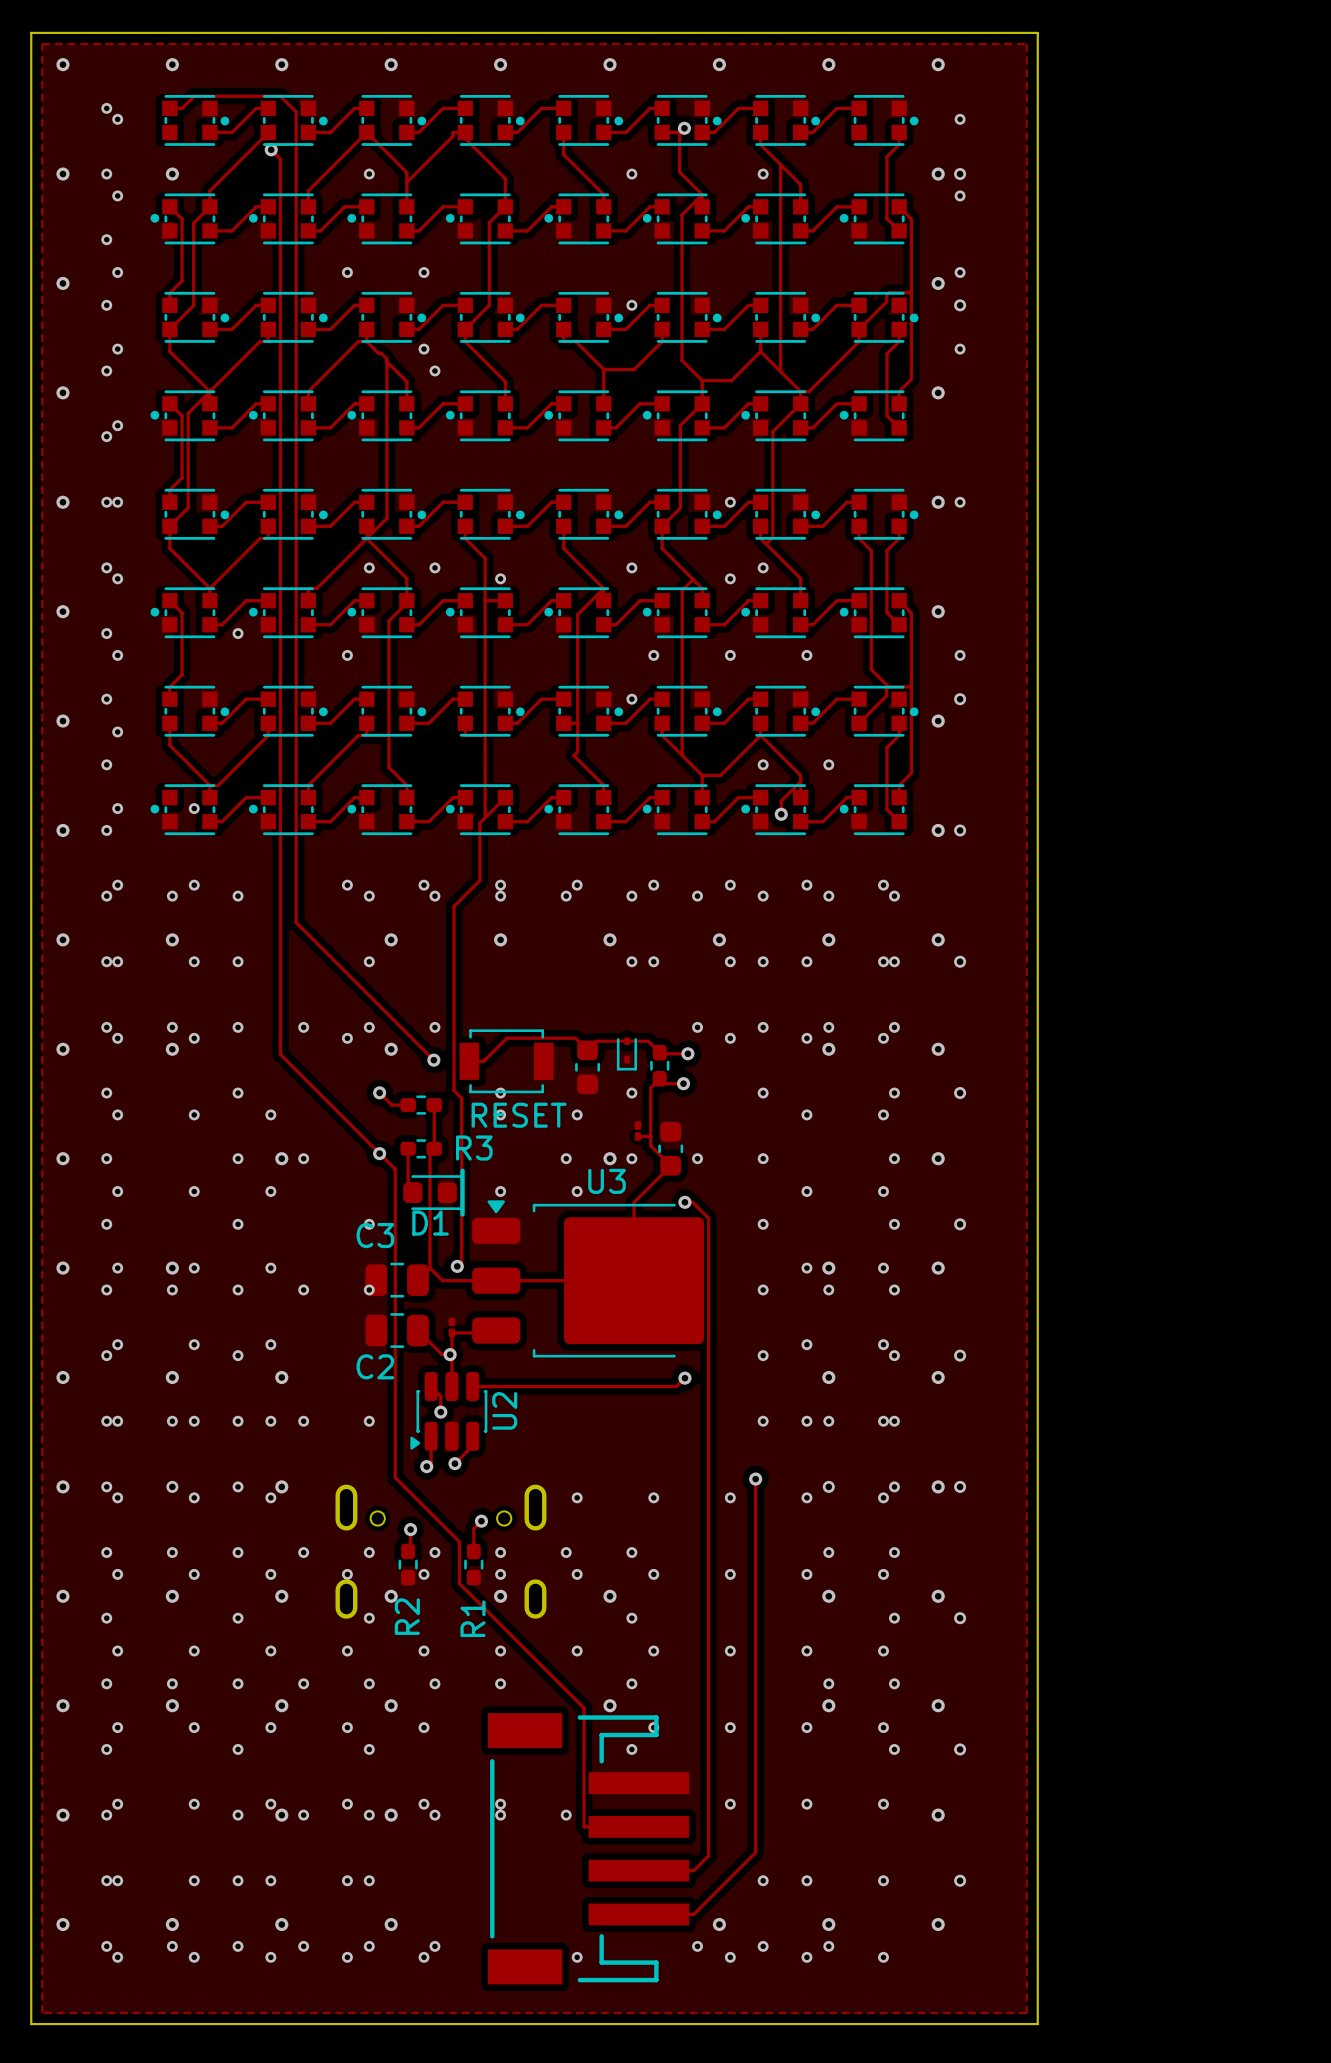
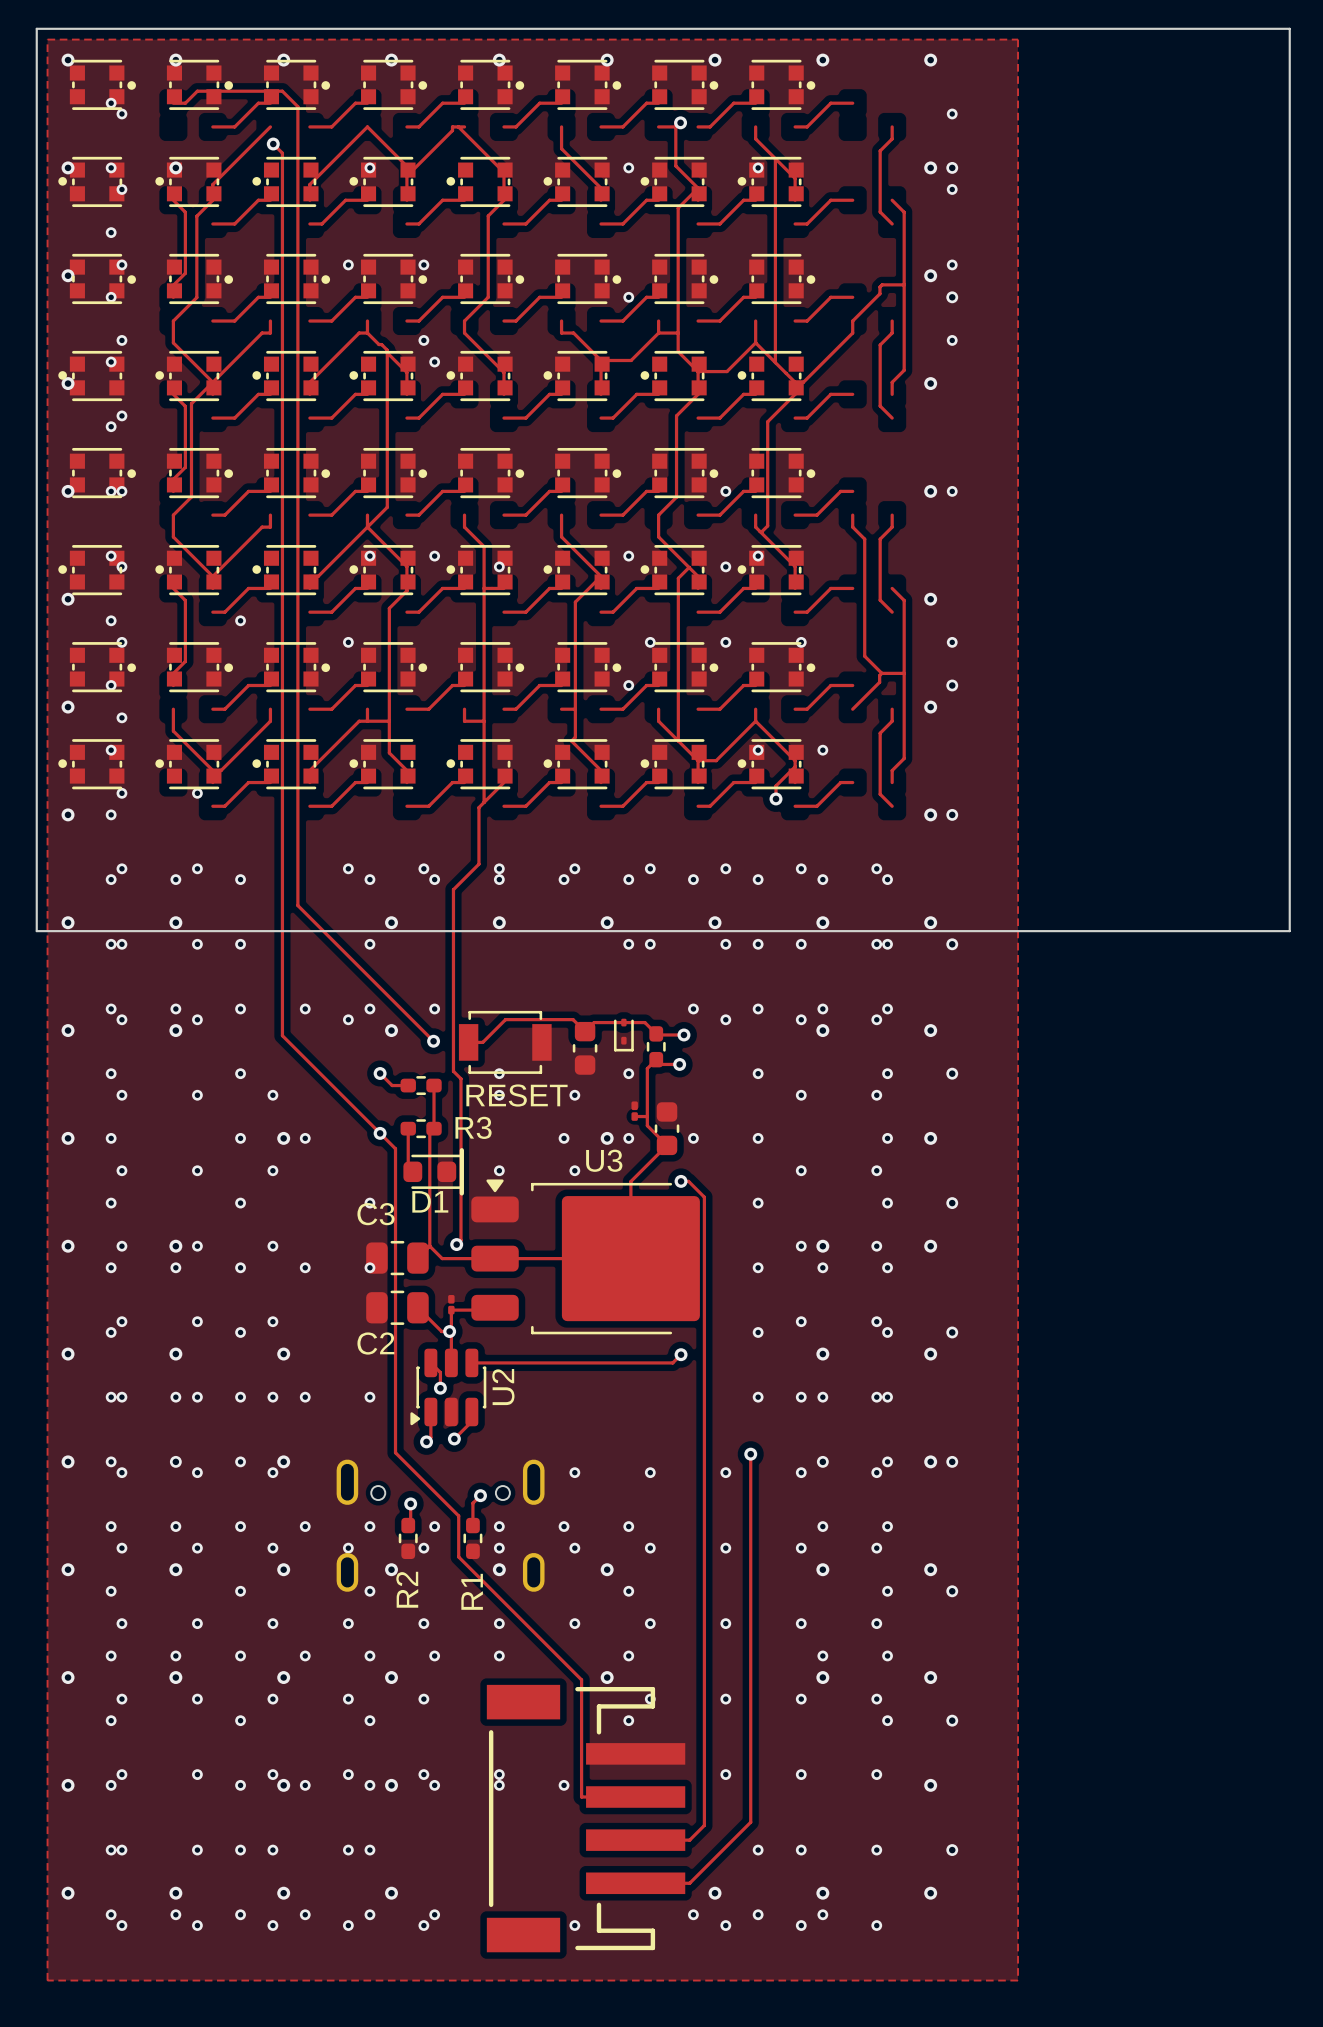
board edge: (1037, 32) (1037, 2024) (31, 2024) (31, 948) -> (1028, 28) (1289, 28) (1289, 931) (36, 931)
part: none -> (102, 84)
part position: (195, 120) -> (199, 84)
part position: (294, 120) -> (297, 84)
part position: (392, 120) -> (394, 84)
part position: (491, 120) -> (491, 84)
part position: (589, 120) -> (588, 84)
part position: (688, 120) -> (685, 84)
part position: (786, 120) -> (782, 84)
part: (884, 120) -> none
part: none -> (91, 181)
part position: (184, 218) -> (188, 181)
part position: (282, 218) -> (285, 181)
part position: (380, 218) -> (382, 181)
part position: (479, 218) -> (479, 181)
part position: (577, 218) -> (576, 181)
part position: (676, 218) -> (673, 181)
part position: (774, 218) -> (770, 181)
part: (873, 218) -> none
part: none -> (102, 278)
part position: (195, 317) -> (199, 278)
part position: (294, 317) -> (297, 278)
part position: (392, 317) -> (394, 278)
part position: (491, 317) -> (491, 278)
part position: (589, 317) -> (588, 278)
part position: (688, 317) -> (685, 278)
part position: (786, 317) -> (782, 278)
part: (884, 317) -> none
part: none -> (91, 376)
part position: (184, 415) -> (188, 376)
part position: (282, 415) -> (285, 376)
part position: (380, 415) -> (382, 376)
part position: (479, 415) -> (479, 376)
part position: (577, 415) -> (576, 376)
part position: (676, 415) -> (673, 376)
part position: (774, 415) -> (770, 376)
part: (873, 415) -> none
part: none -> (102, 473)
part position: (195, 514) -> (199, 473)
part position: (294, 514) -> (297, 473)
part position: (392, 514) -> (394, 473)
part position: (491, 514) -> (491, 473)
part position: (589, 514) -> (588, 473)
part position: (688, 514) -> (685, 473)
part position: (786, 514) -> (782, 473)
part: (884, 514) -> none
part: none -> (91, 570)
part position: (184, 612) -> (188, 570)
part position: (282, 612) -> (285, 570)
part position: (380, 612) -> (382, 570)
part position: (479, 612) -> (479, 570)
part position: (577, 612) -> (576, 570)
part position: (676, 612) -> (673, 570)
part position: (774, 612) -> (770, 570)
part: (873, 612) -> none
part: none -> (102, 667)
part position: (195, 711) -> (199, 667)
part position: (294, 711) -> (297, 667)
part position: (392, 711) -> (394, 667)
part position: (491, 711) -> (491, 667)
part position: (589, 711) -> (588, 667)
part position: (688, 711) -> (685, 667)
part position: (786, 711) -> (782, 667)
part: (884, 711) -> none
part: none -> (91, 764)
part position: (184, 809) -> (188, 764)
part position: (282, 809) -> (285, 764)
part position: (380, 809) -> (382, 764)
part position: (479, 809) -> (479, 764)
part position: (577, 809) -> (576, 764)
part position: (676, 809) -> (673, 764)
part position: (774, 809) -> (770, 764)
part: (873, 809) -> none

